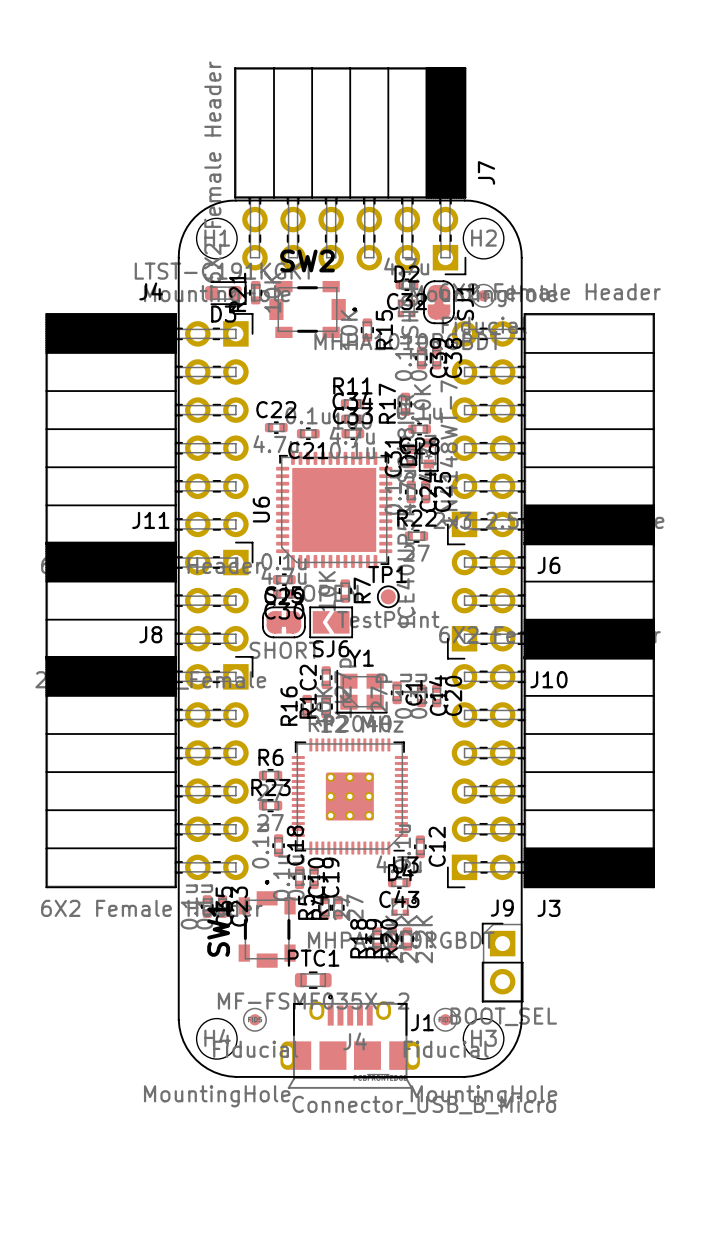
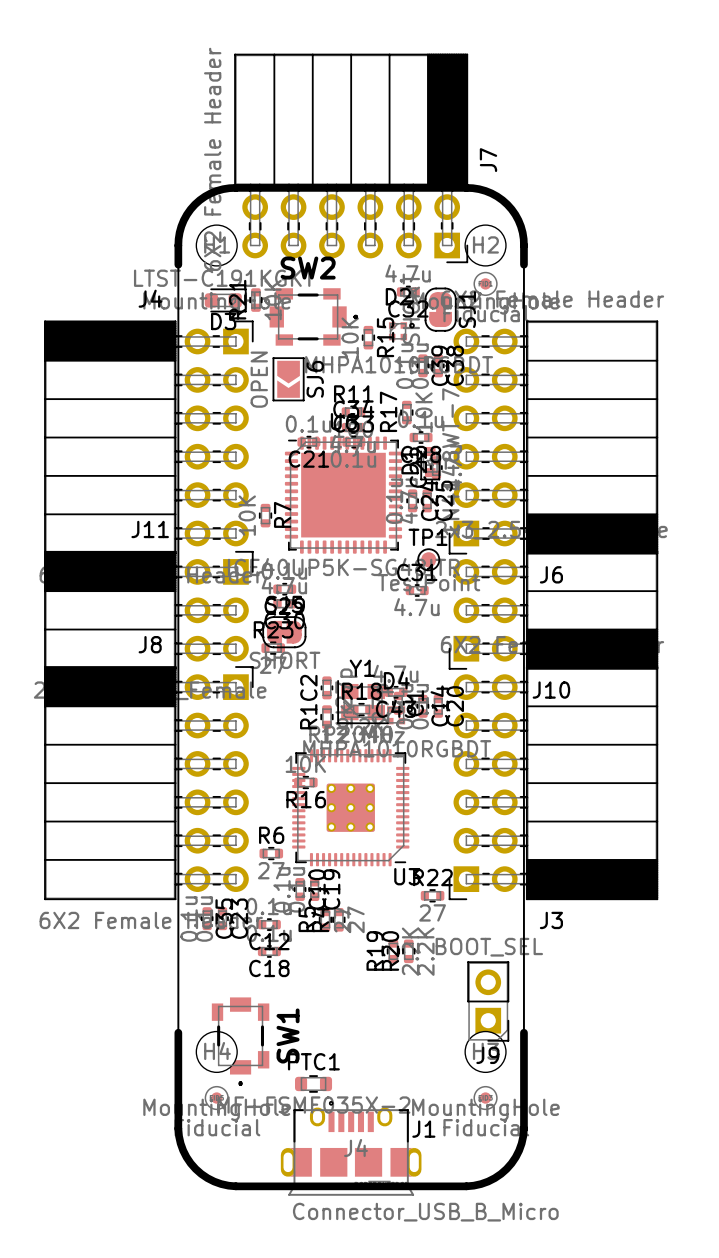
J7 position: (350, 171) -> (351, 158)
board edge: (178, 257) (184, 232) (195, 217) (210, 205) (235, 200) (477, 201) (495, 209) (509, 221) (518, 238) (521, 257) -> (178, 264) (179, 232) (190, 209) (210, 193) (235, 187) (479, 189) (497, 196) (515, 214) (522, 232) (523, 264)
part position: (483, 295) -> (485, 283)
D2 position: (410, 308) -> (401, 331)
C22 rotation: 0° (276, 427) -> 90° clockwise (436, 467)
C22 position: (276, 427) -> (436, 467)
C31 rotation: 0° (411, 457) -> 90° clockwise (417, 590)
C31 position: (411, 457) -> (417, 590)
U6 rotation: 0° (334, 509) -> 90° clockwise (343, 495)
R22 position: (416, 536) -> (432, 895)
R7 position: (345, 591) -> (265, 515)
TP1 position: (388, 596) -> (428, 559)
SJ6 rotation: 0° (331, 622) -> 90° counterclockwise (288, 379)
SJ6 position: (331, 622) -> (288, 379)
R16 rotation: 0° (307, 706) -> 90° clockwise (305, 782)
R16 position: (307, 706) -> (305, 782)
R6 position: (270, 775) -> (271, 853)
R23 position: (270, 805) -> (273, 648)
C18 rotation: 0° (278, 845) -> 90° clockwise (269, 951)
C18 position: (278, 845) -> (269, 951)
C12 rotation: 0° (420, 846) -> 90° clockwise (269, 924)
C12 position: (420, 846) -> (269, 924)
C43 position: (399, 882) -> (396, 692)
D4 position: (403, 907) -> (399, 715)
SW1 rotation: 0° (267, 923) -> 180° (240, 1041)
SW1 position: (267, 923) -> (240, 1041)
R18 rotation: 0° (376, 939) -> 90° clockwise (361, 709)
R18 position: (376, 939) -> (361, 709)
J9 rotation: 0° (502, 962) -> 180° (488, 1001)
PTC1 position: (313, 980) -> (313, 1083)
board edge: (178, 1019) (183, 1041) (195, 1059) (214, 1072) (235, 1076) (471, 1076) (492, 1068) (504, 1059) (516, 1041) (521, 1019) -> (178, 1032) (178, 1128) (183, 1150) (190, 1163) (207, 1178) (221, 1184) (235, 1186) (466, 1186) (481, 1184) (494, 1178) (511, 1163) (519, 1150) (523, 1136) (523, 1032)
part position: (254, 1019) -> (216, 1098)
part position: (445, 1019) -> (485, 1098)
J1 position: (350, 1041) -> (351, 1148)

